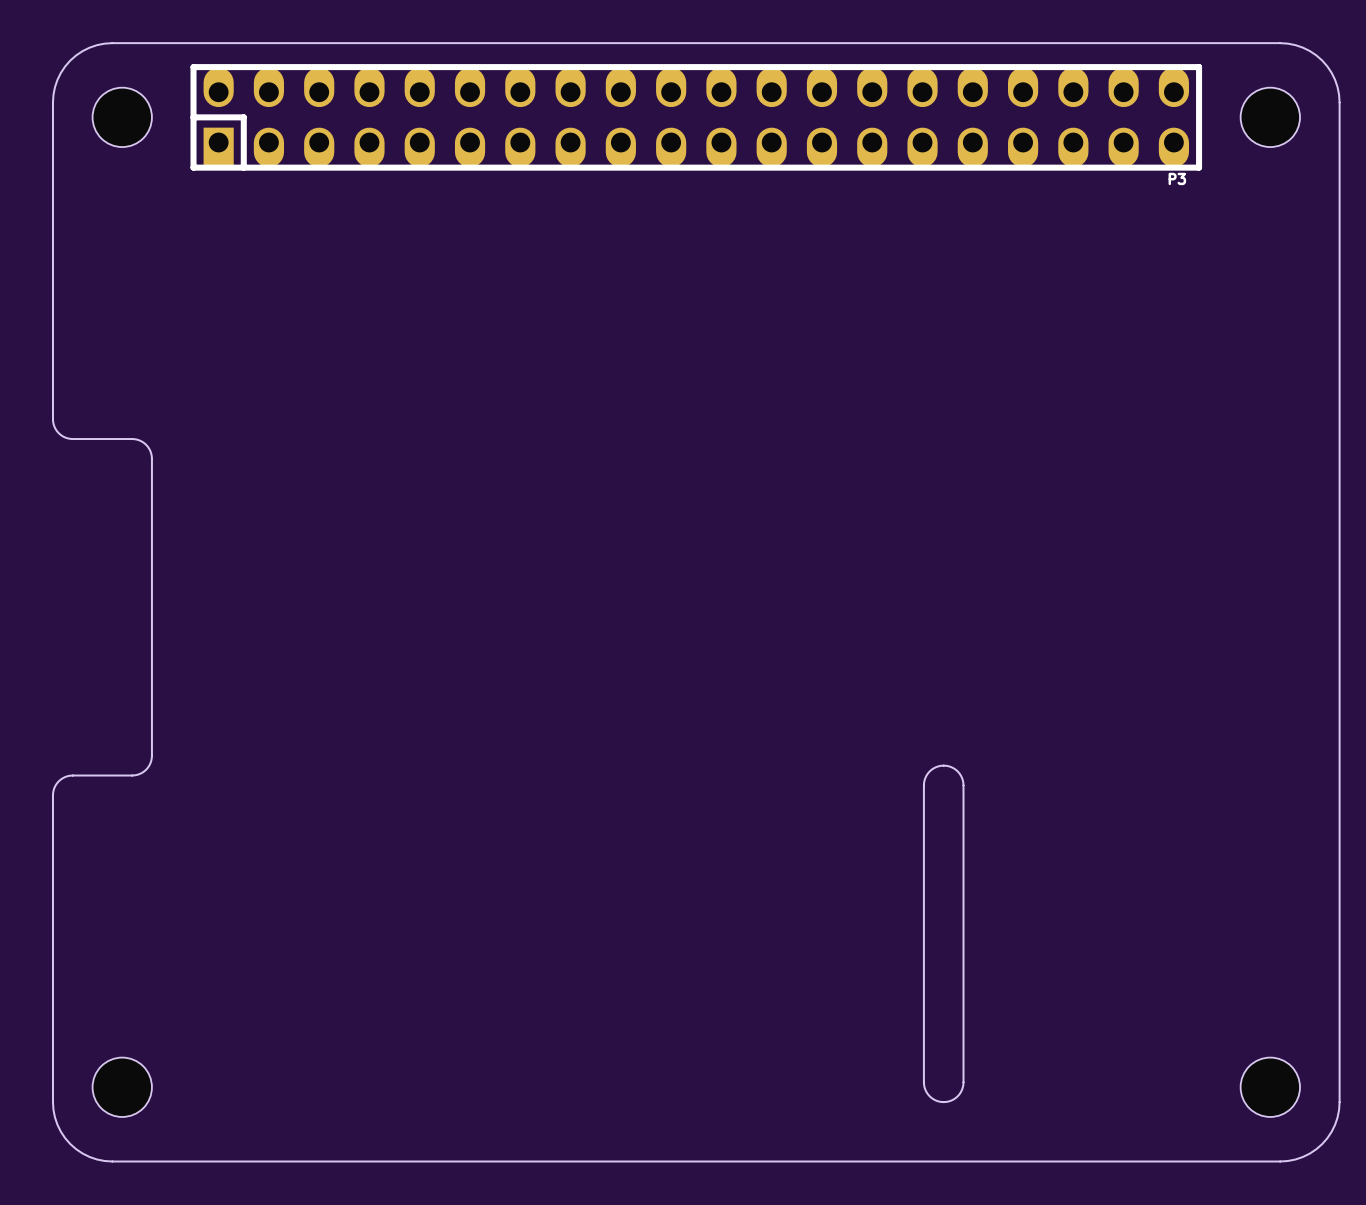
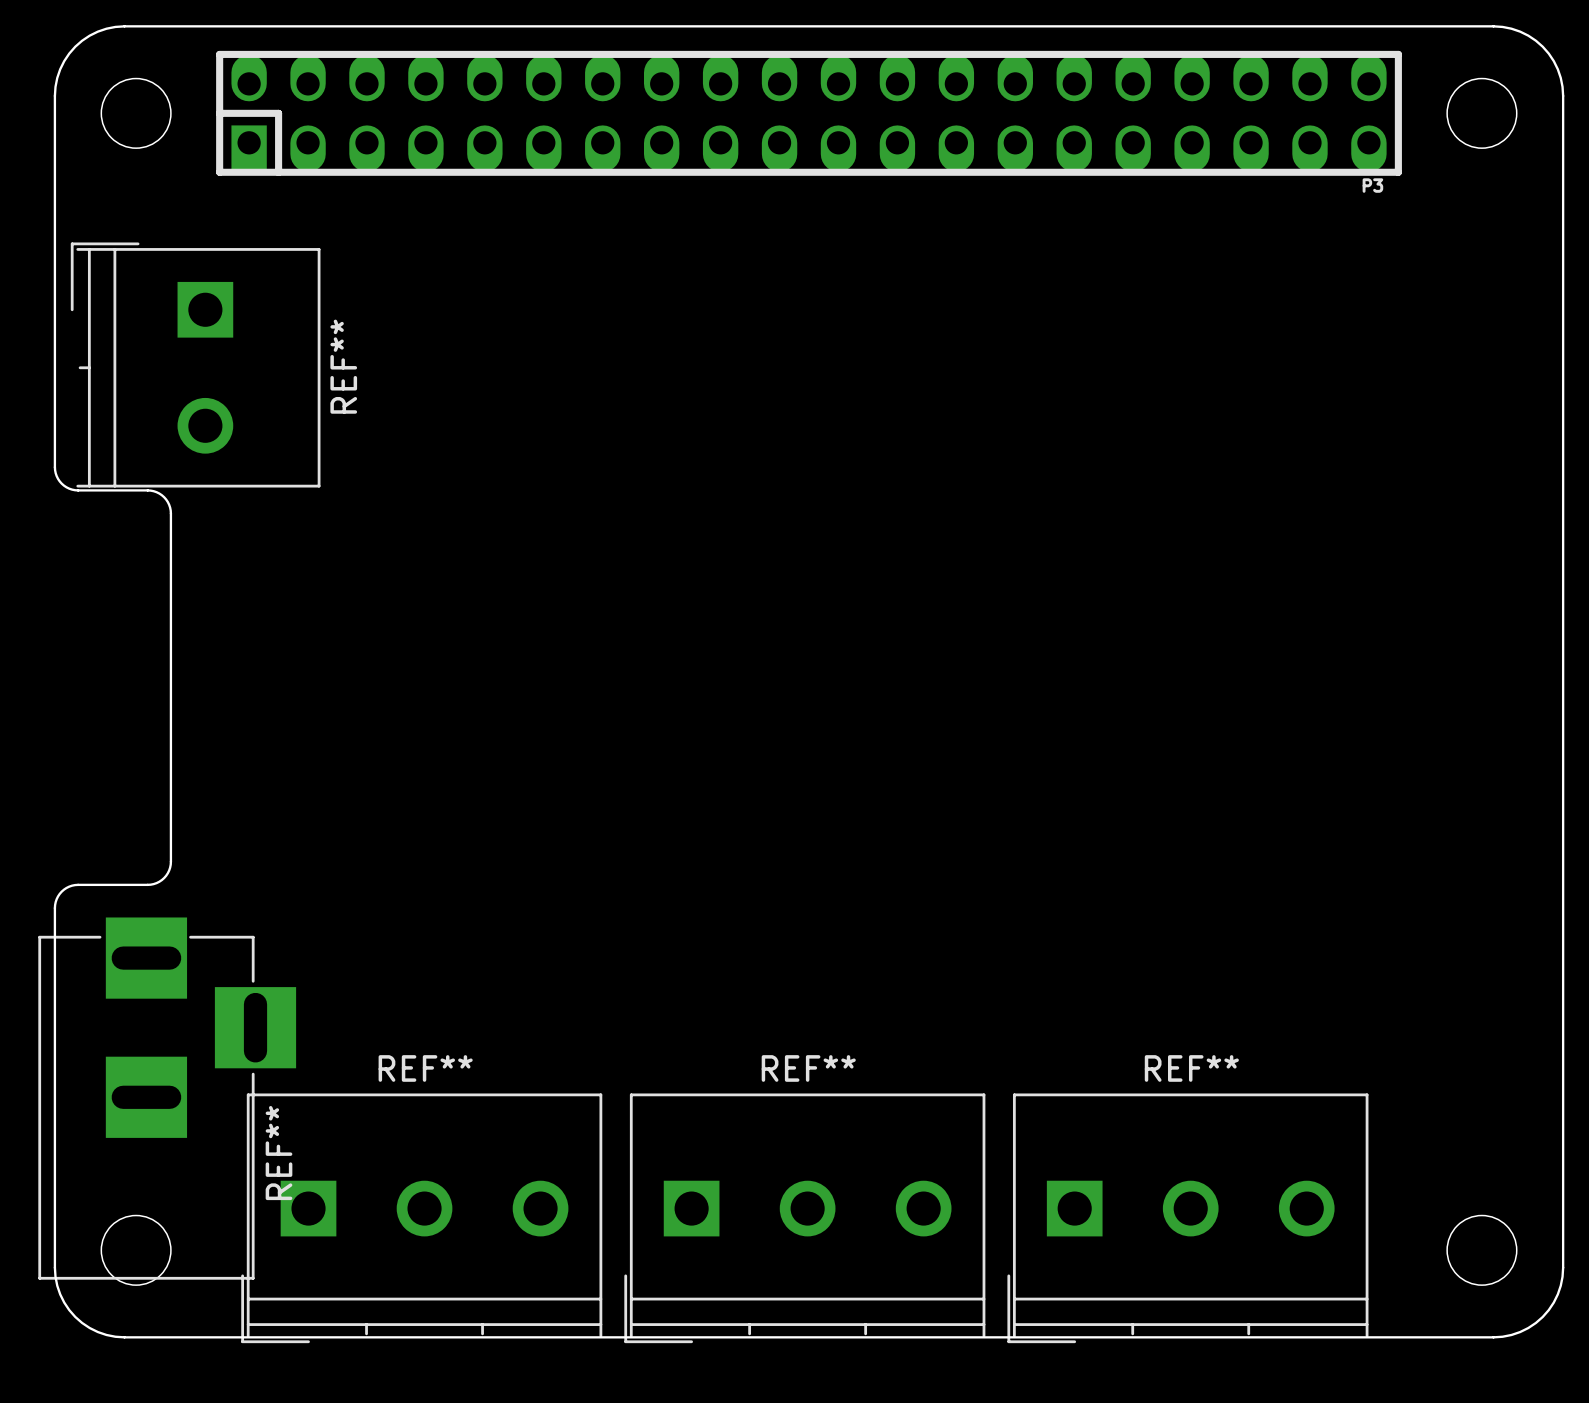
REF**: none -> (195, 365)
board edge: (943, 765) (951, 767) (957, 771) (962, 777) (963, 785) (963, 1082) (962, 1089) (957, 1096) (951, 1100) (943, 1102) (936, 1100) (929, 1096) (925, 1089) (923, 1082) (923, 785) (925, 777) (929, 771) (936, 767) (943, 765) -> none
REF**: none -> (167, 1098)
REF**: none -> (421, 1218)
REF**: none -> (804, 1218)
REF**: none -> (1187, 1218)

